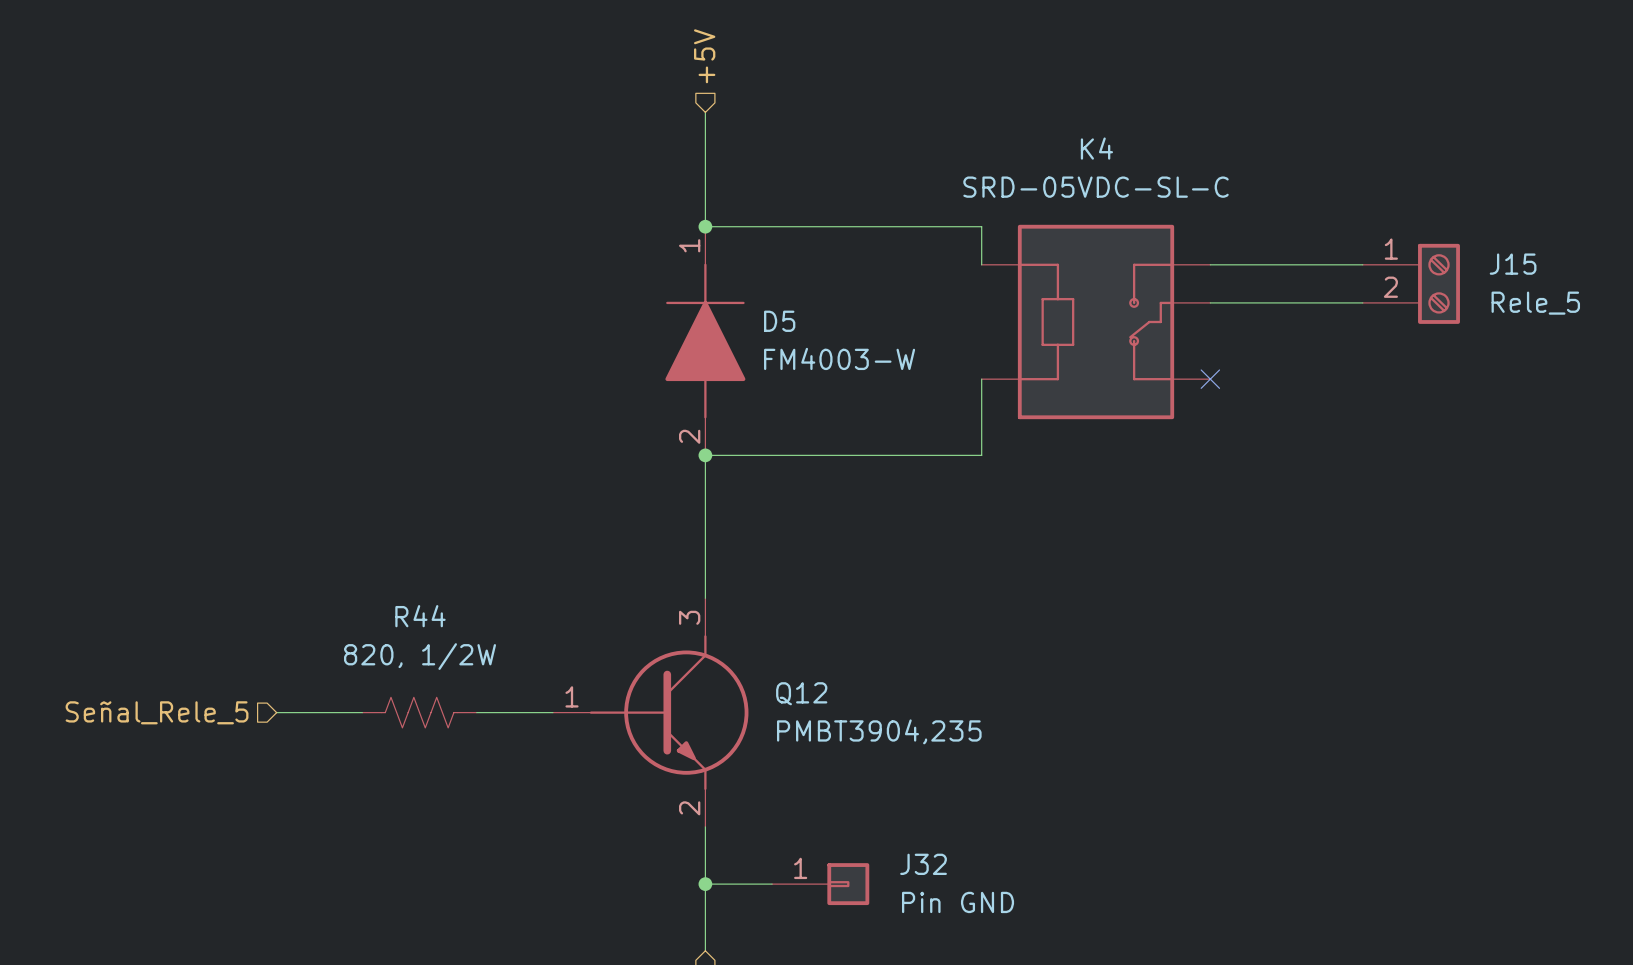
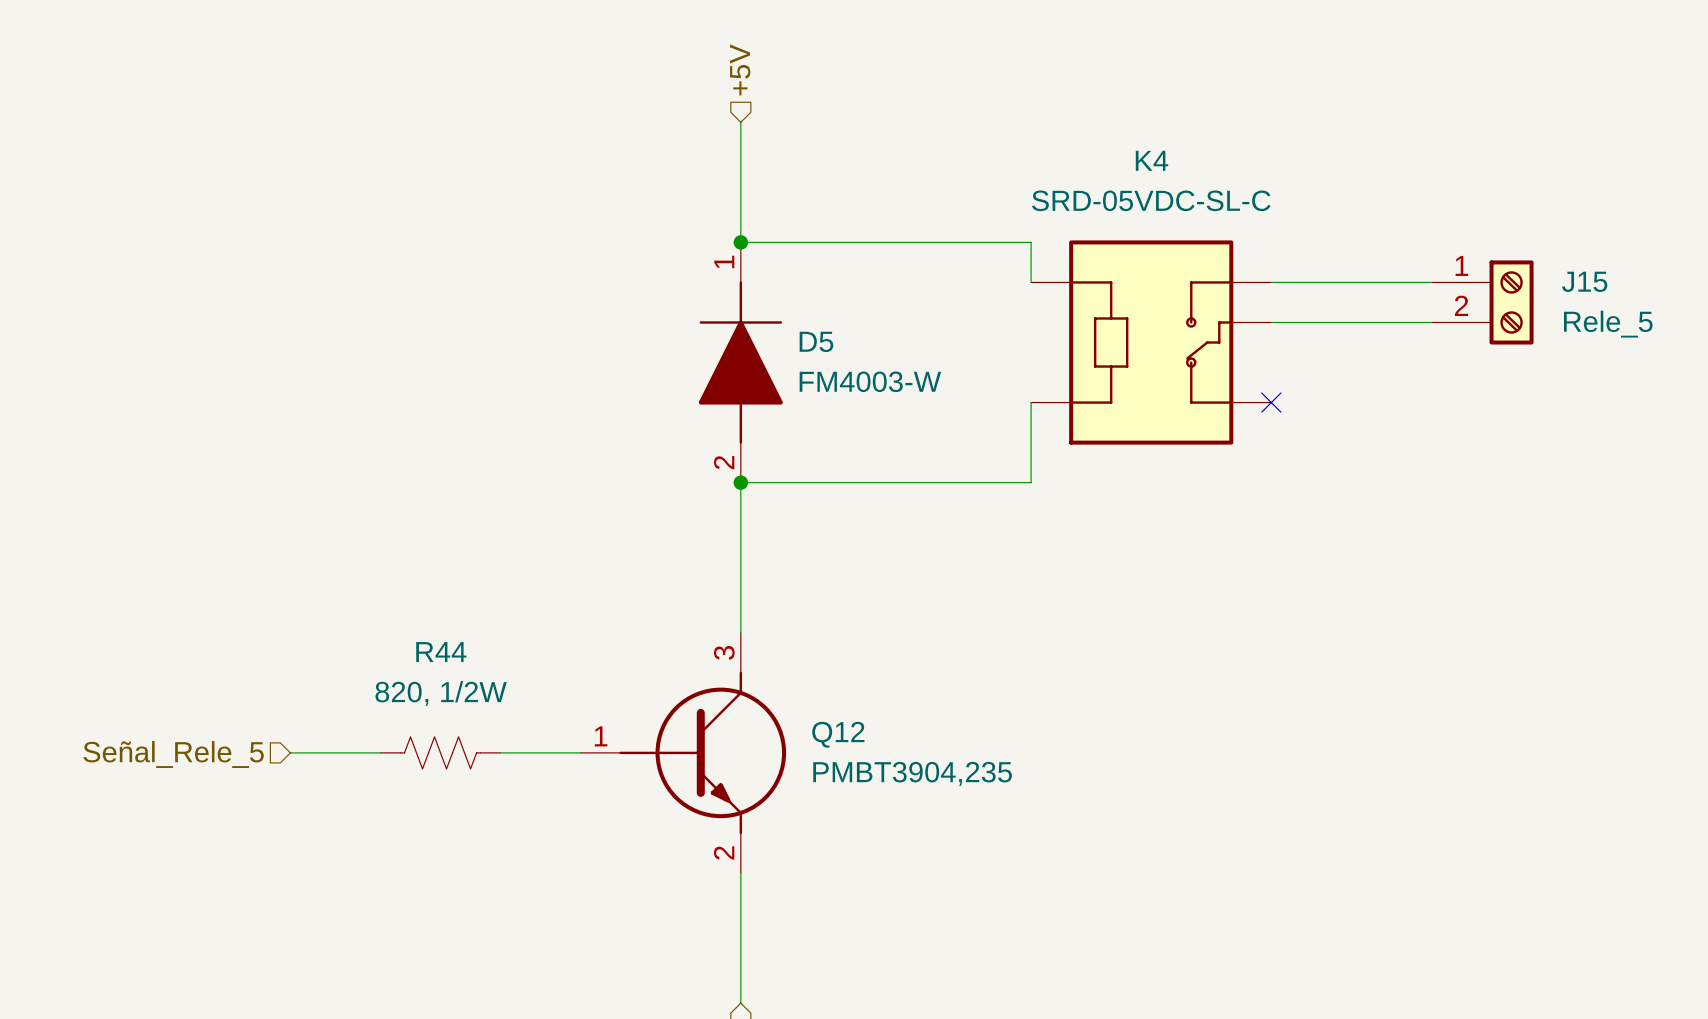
wire: (705, 884) (772, 884) -> none
junction: (705, 884) -> none
J32: Pin GND (820, 884) -> none

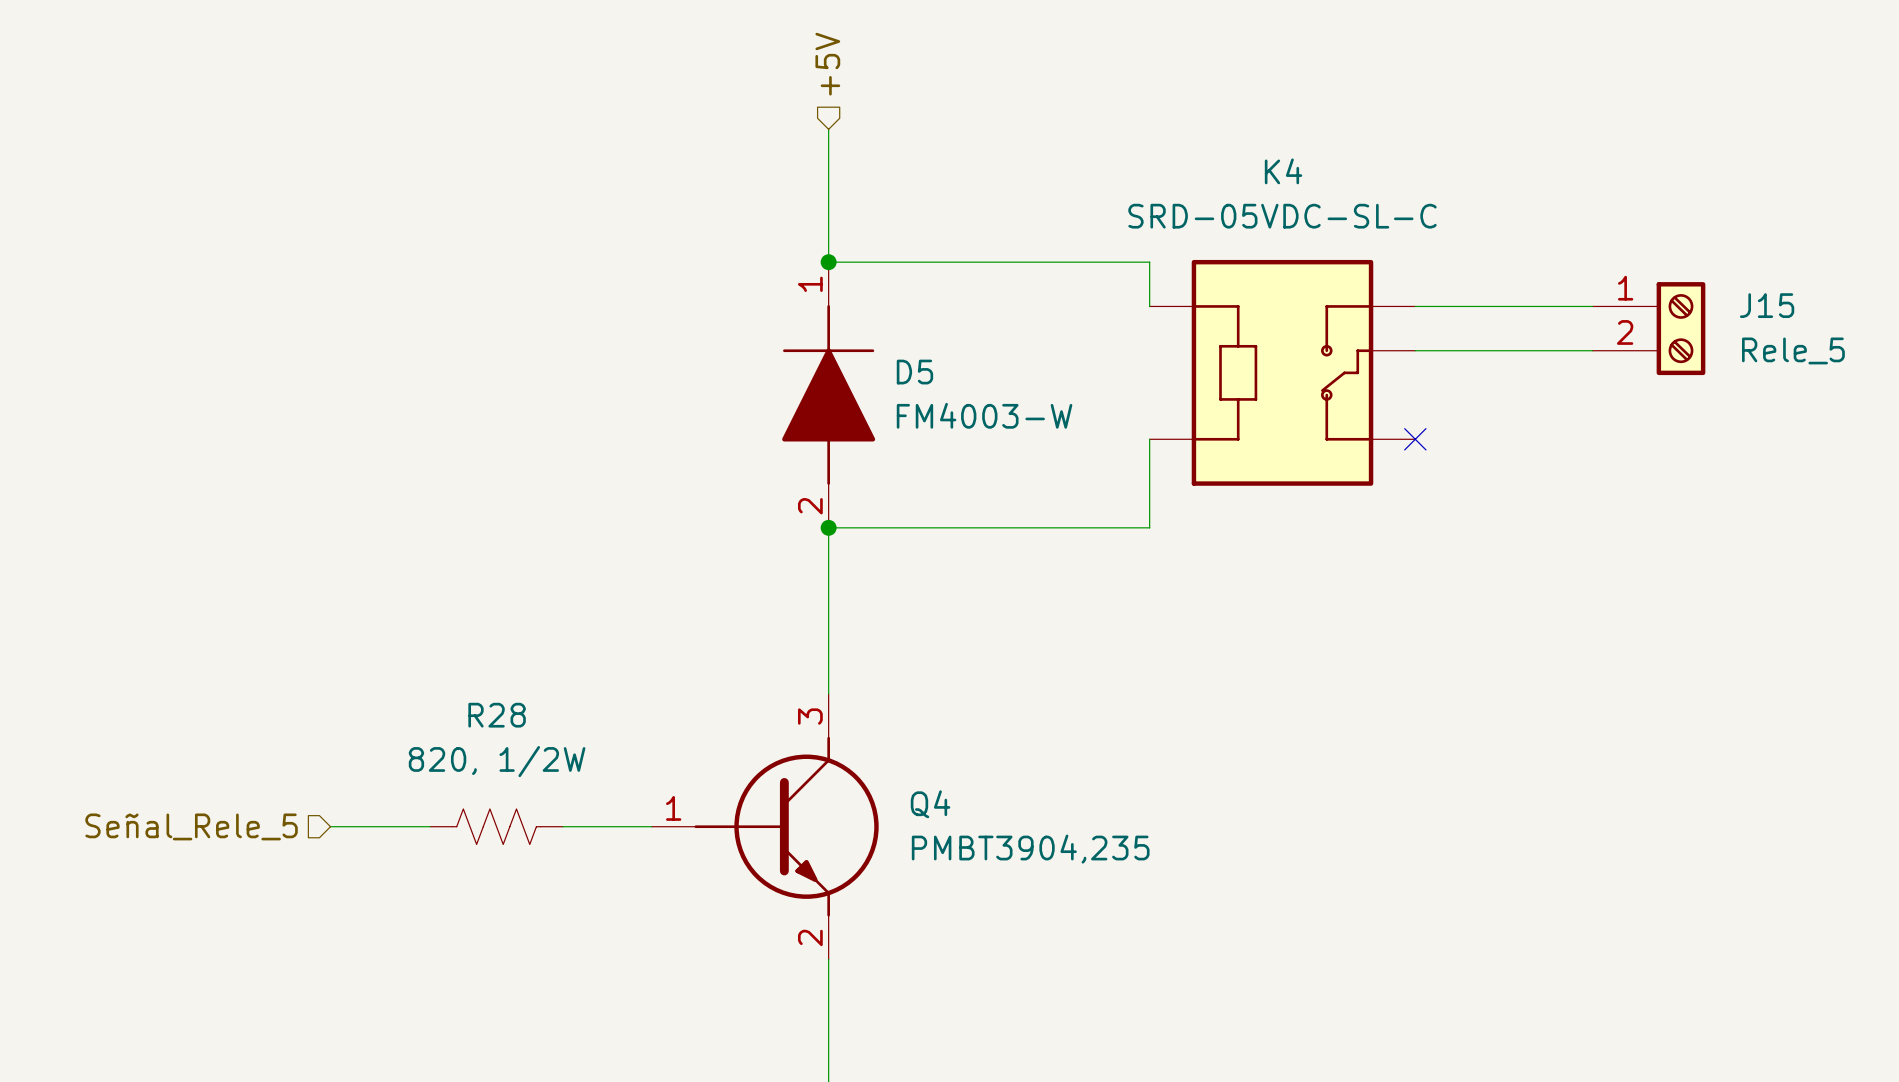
R44 name: R44 (441, 652) -> R28 (497, 715)
Q12 name: Q12 (838, 734) -> Q4 (930, 804)

